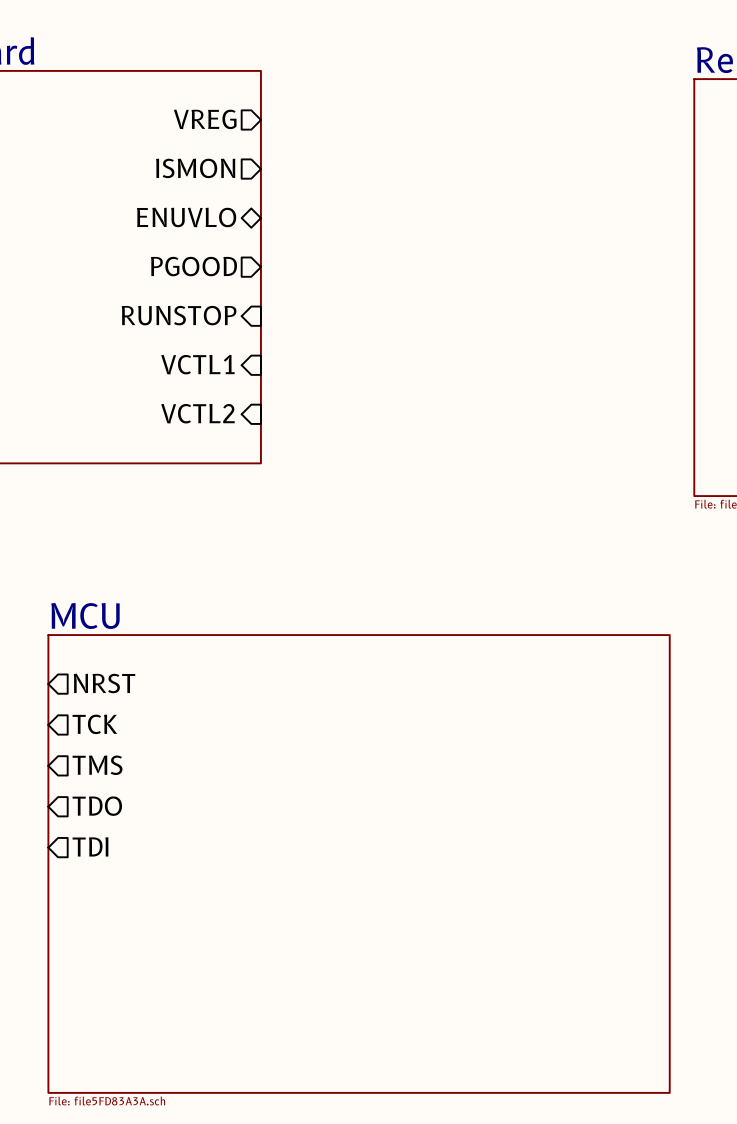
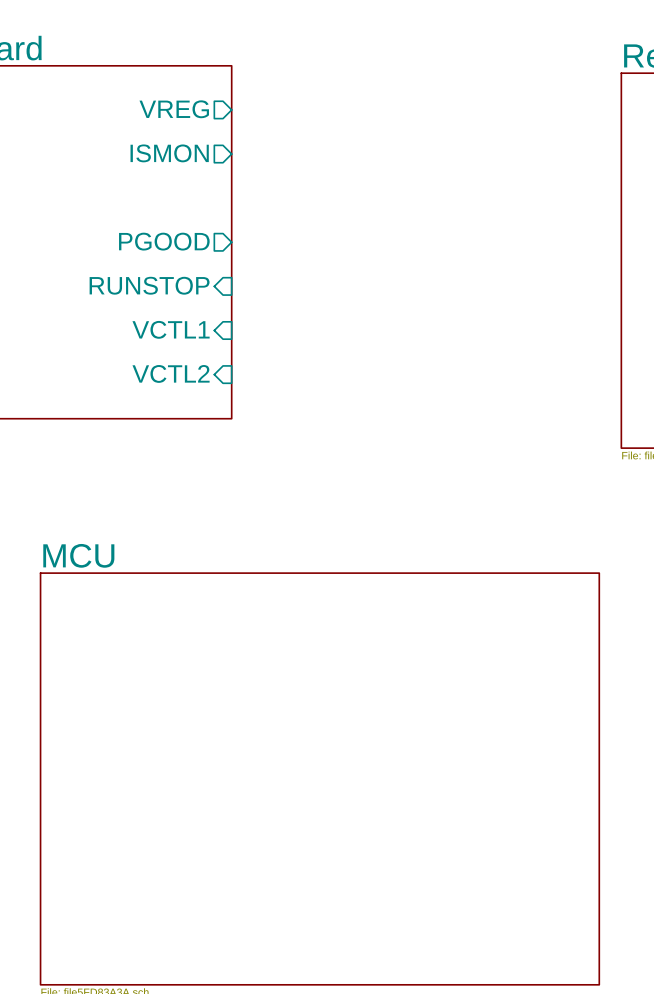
sheet pin: ENUVLO (186, 217) -> none
sheet pin: NRST (104, 683) -> none
sheet pin: TCK (94, 724) -> none
sheet pin: TMS (97, 765) -> none
sheet pin: TDO (97, 806) -> none
sheet pin: TDI (90, 846) -> none

